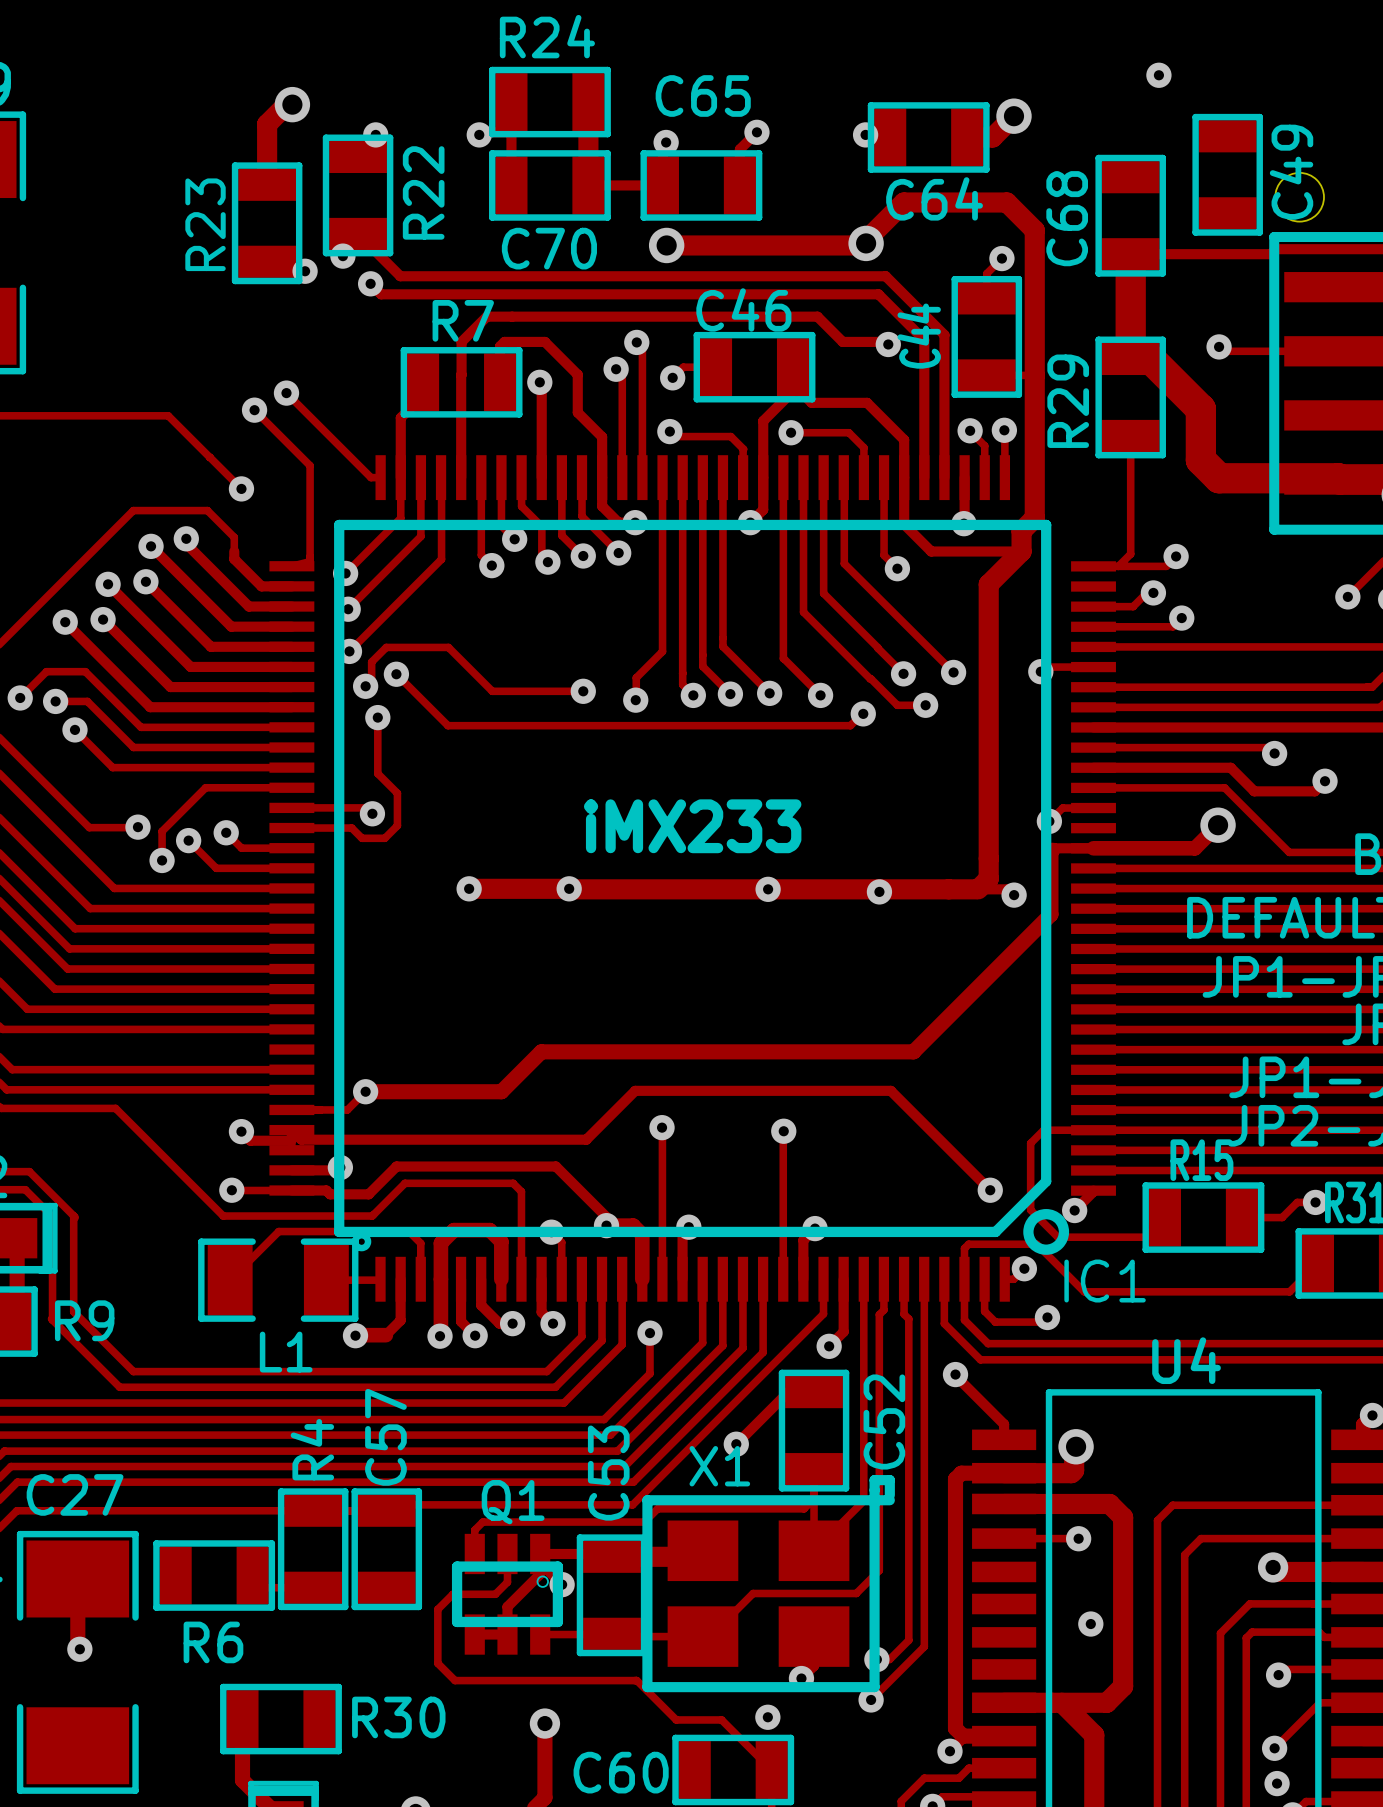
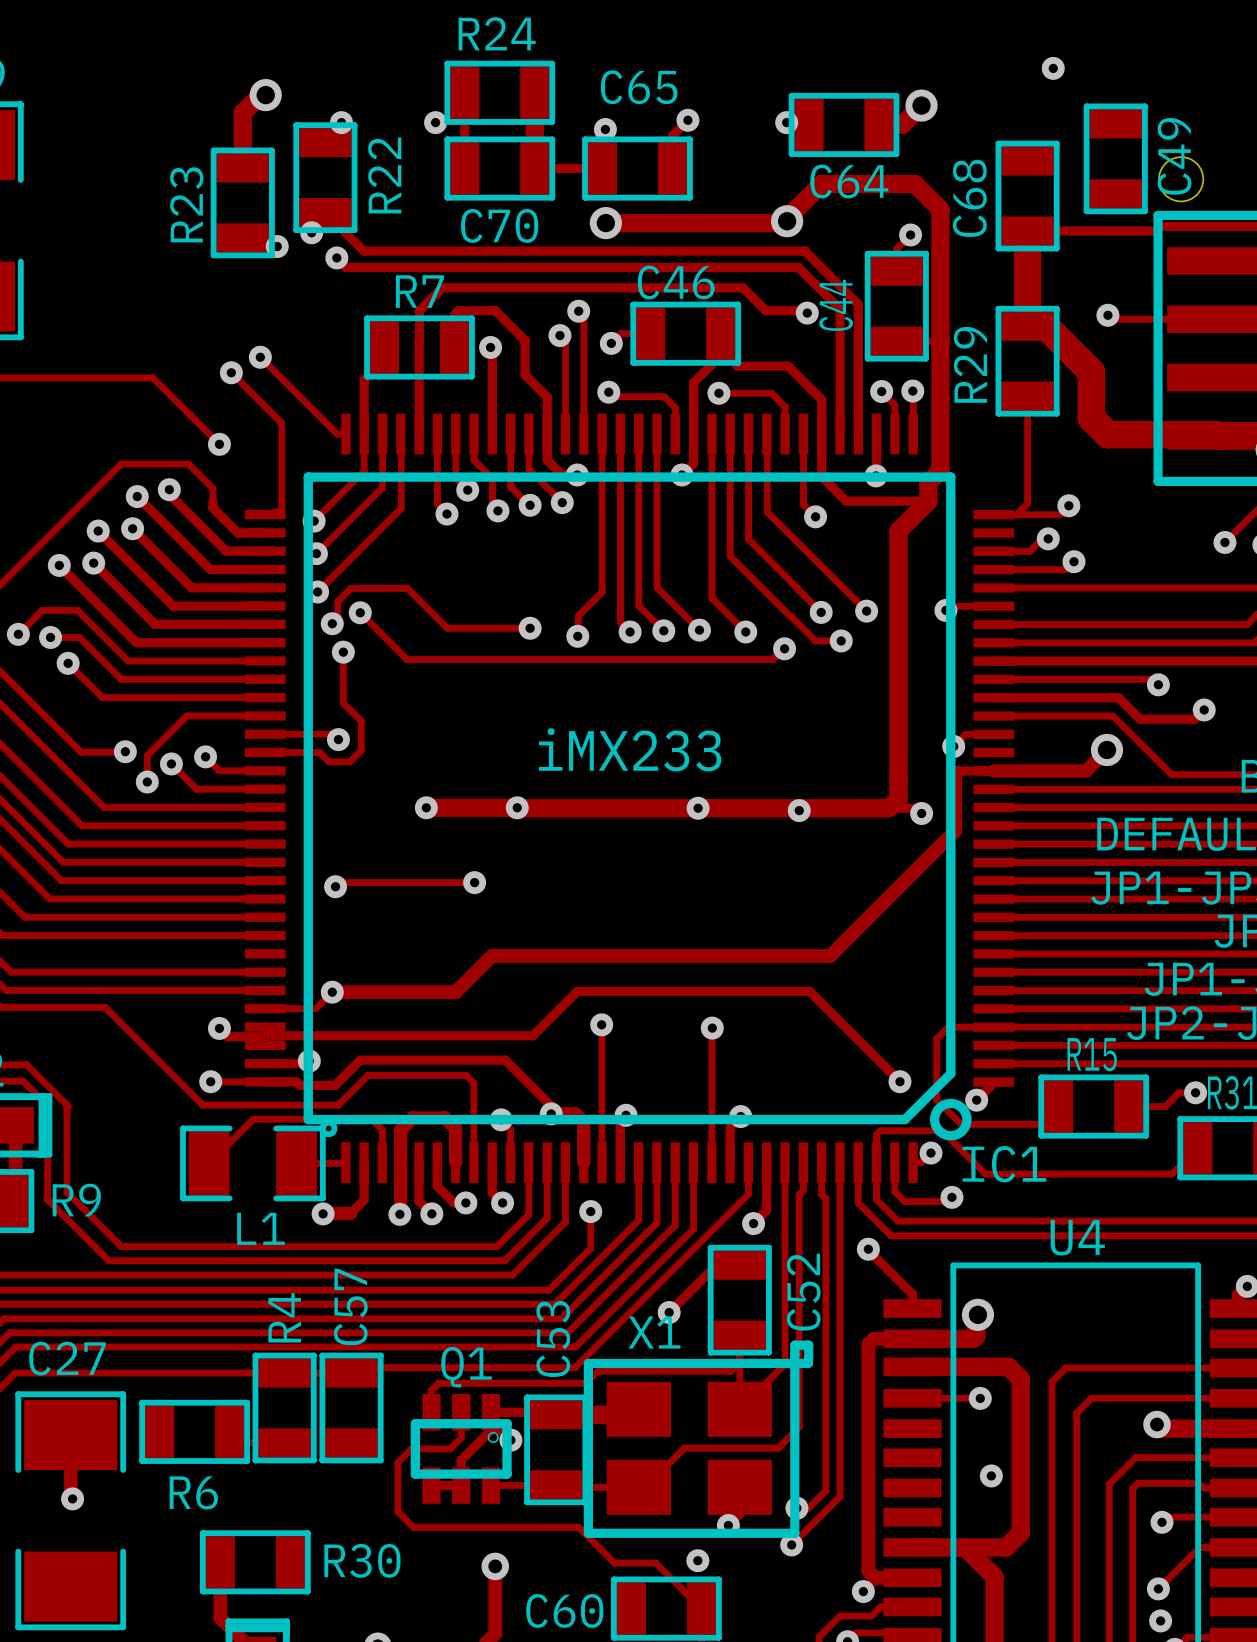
track: none -> (474, 882) (339, 882) (335, 886)
via: none -> (474, 882)
via: none -> (335, 886)

